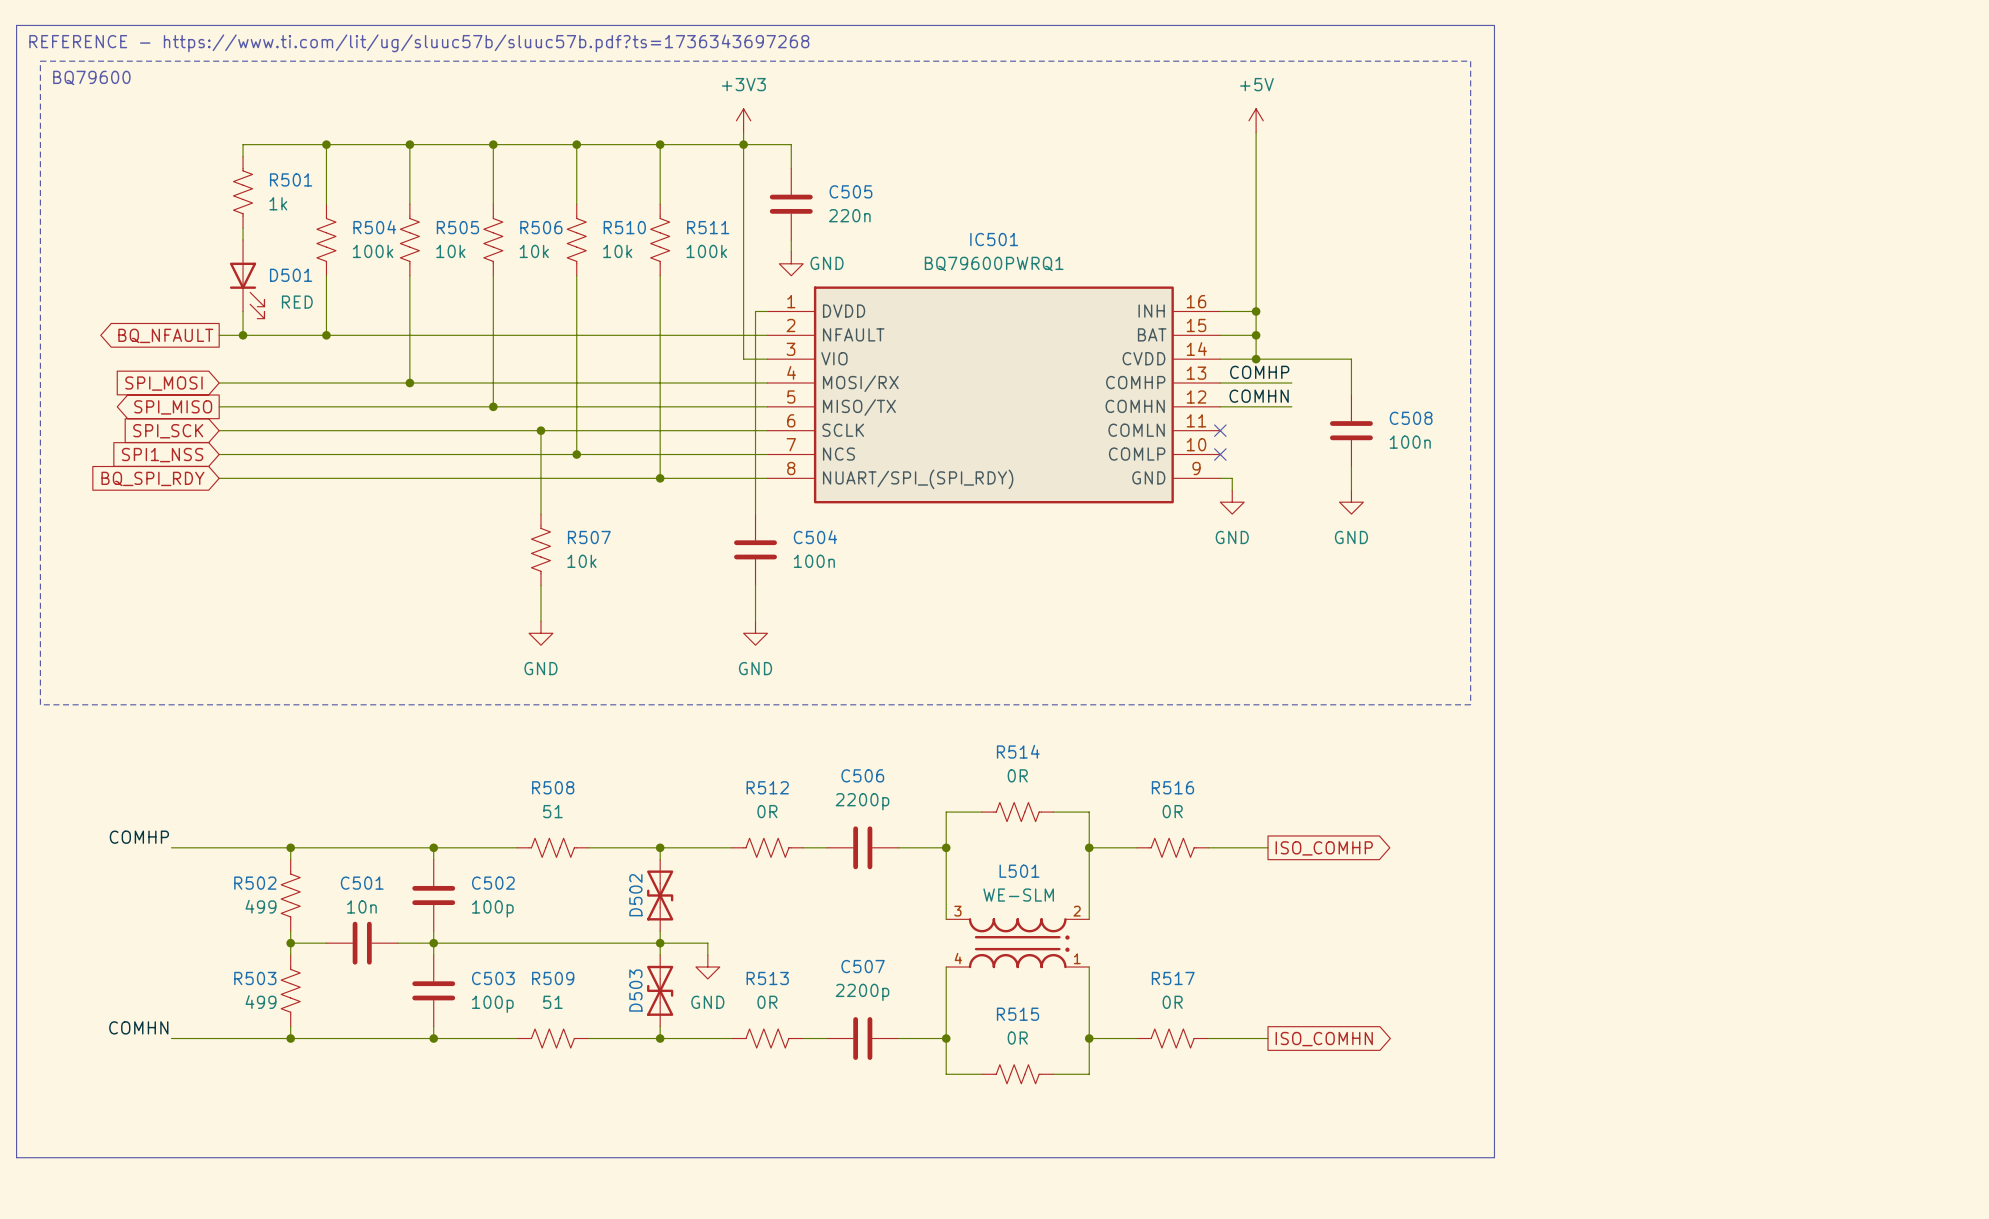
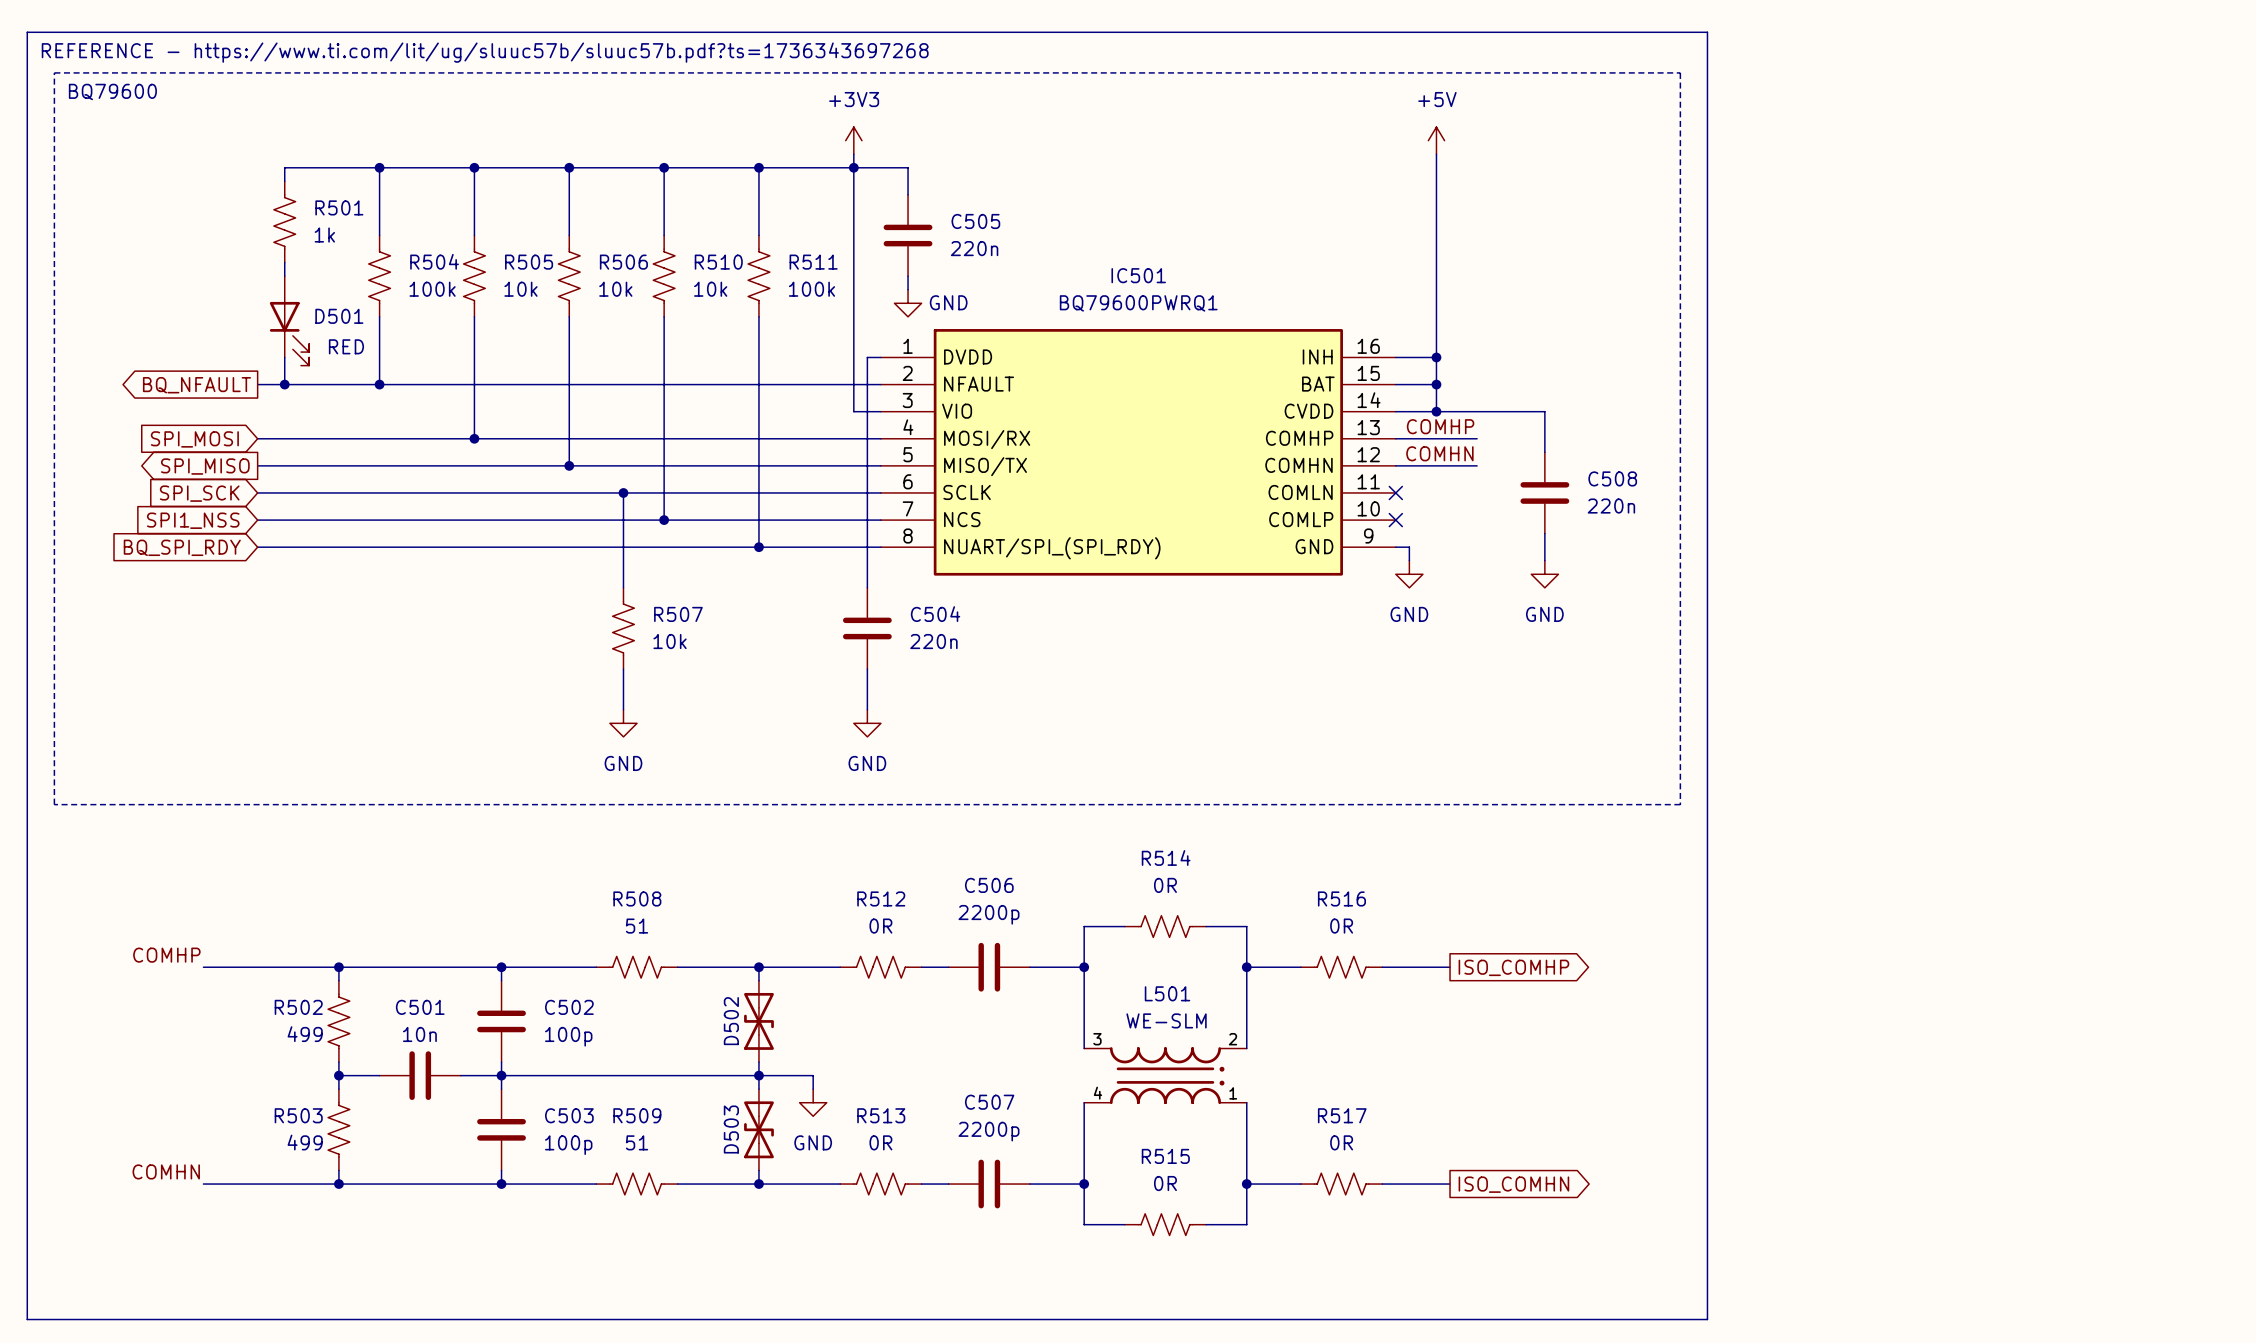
C508 value: 100n (1410, 442) -> 220n (1611, 506)
C504 value: 100n (814, 561) -> 220n (933, 641)

